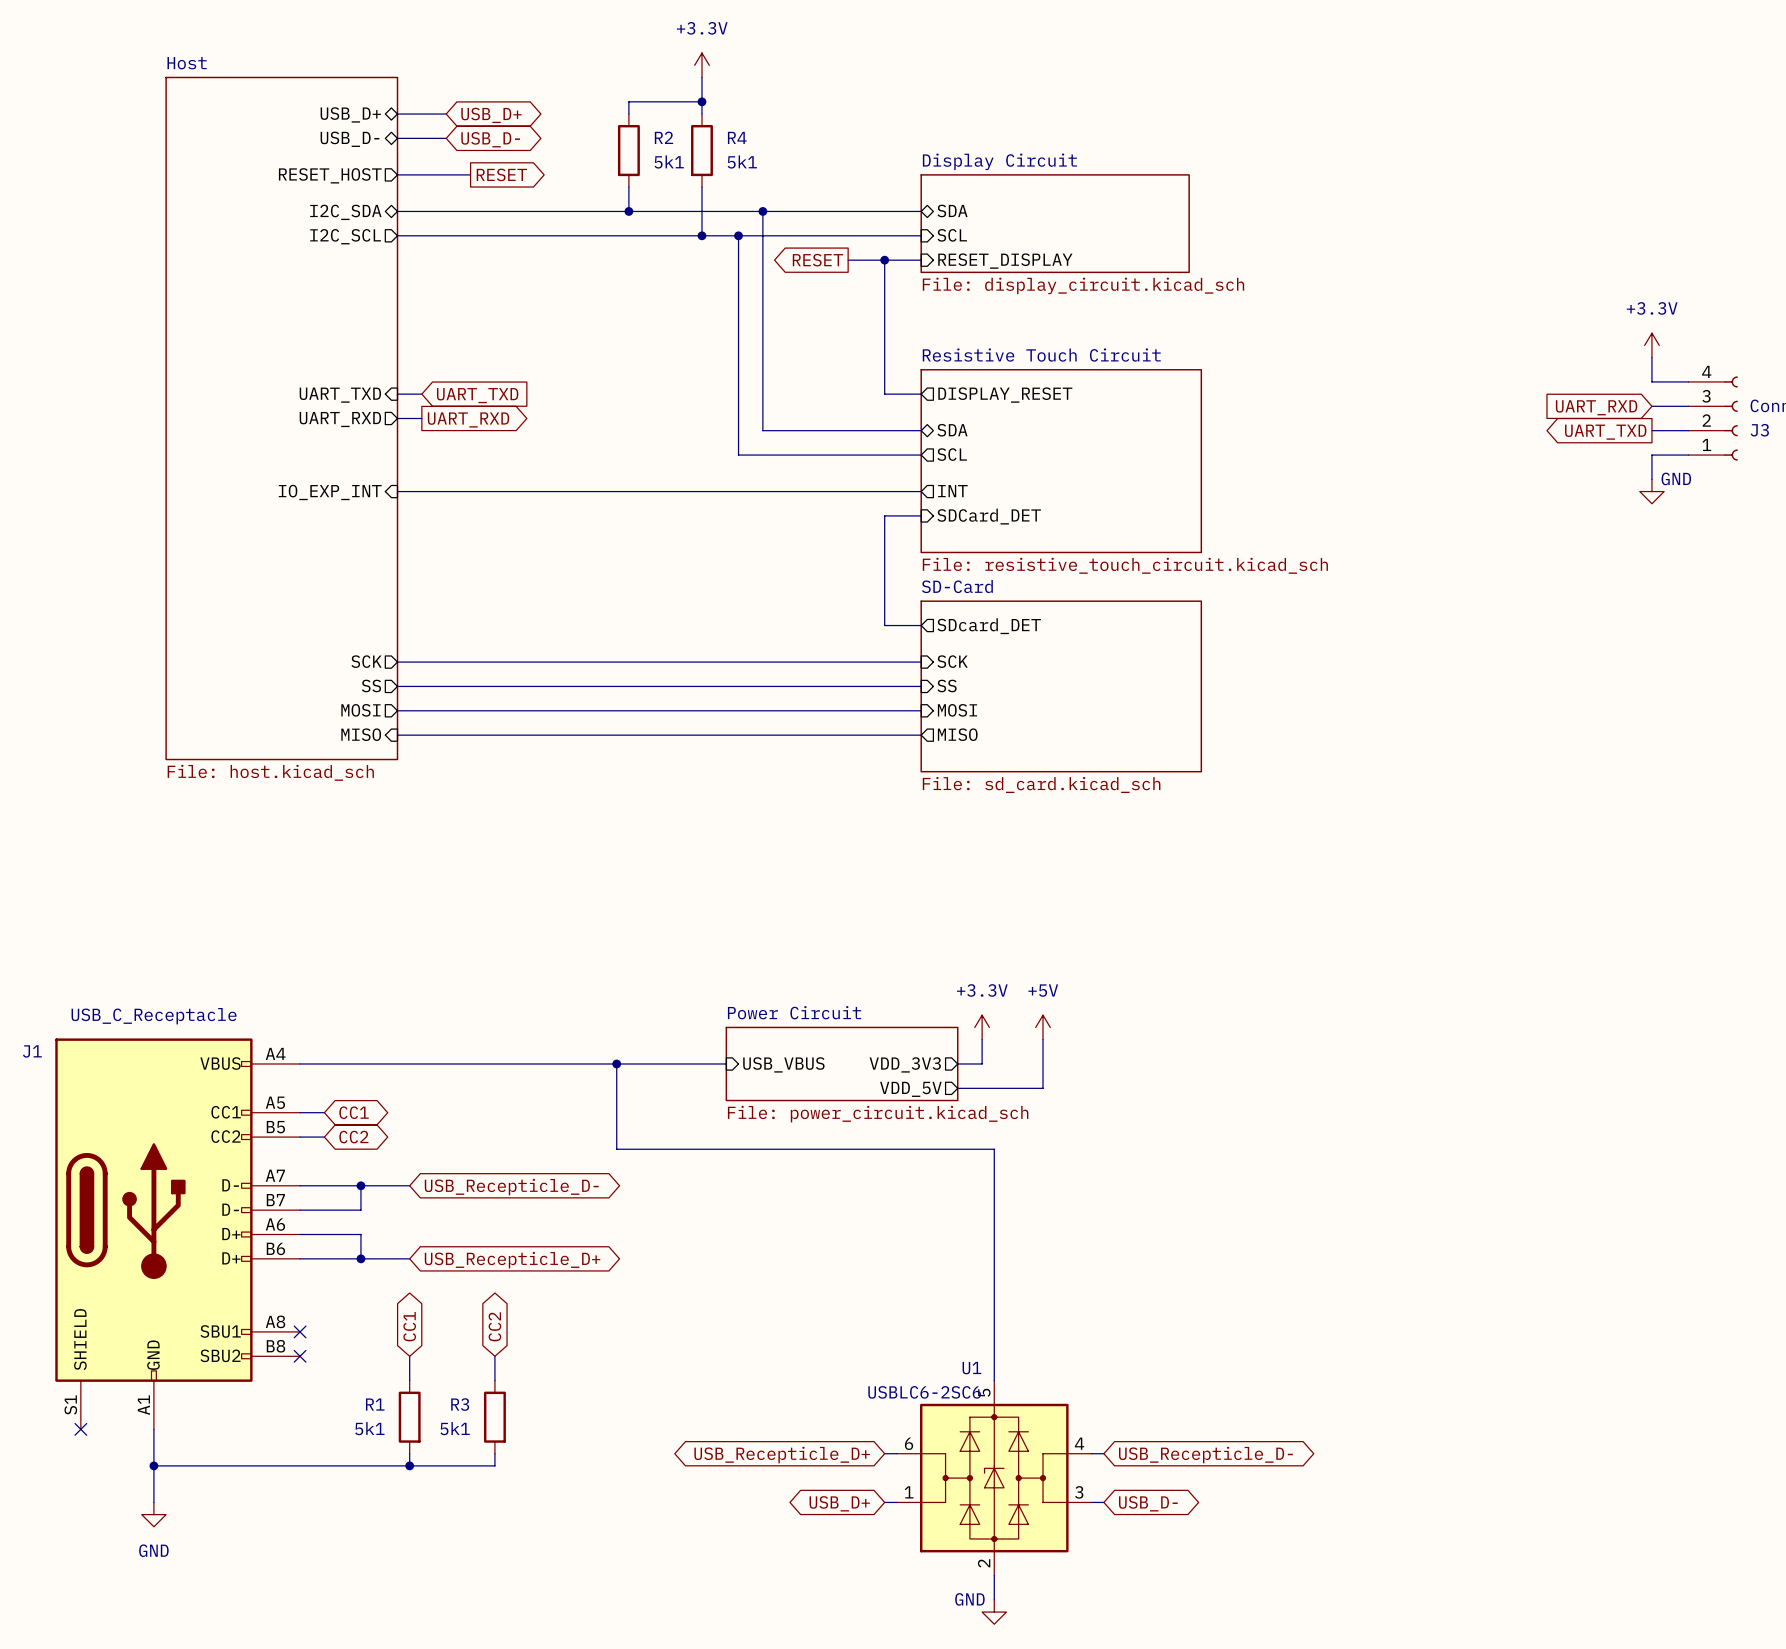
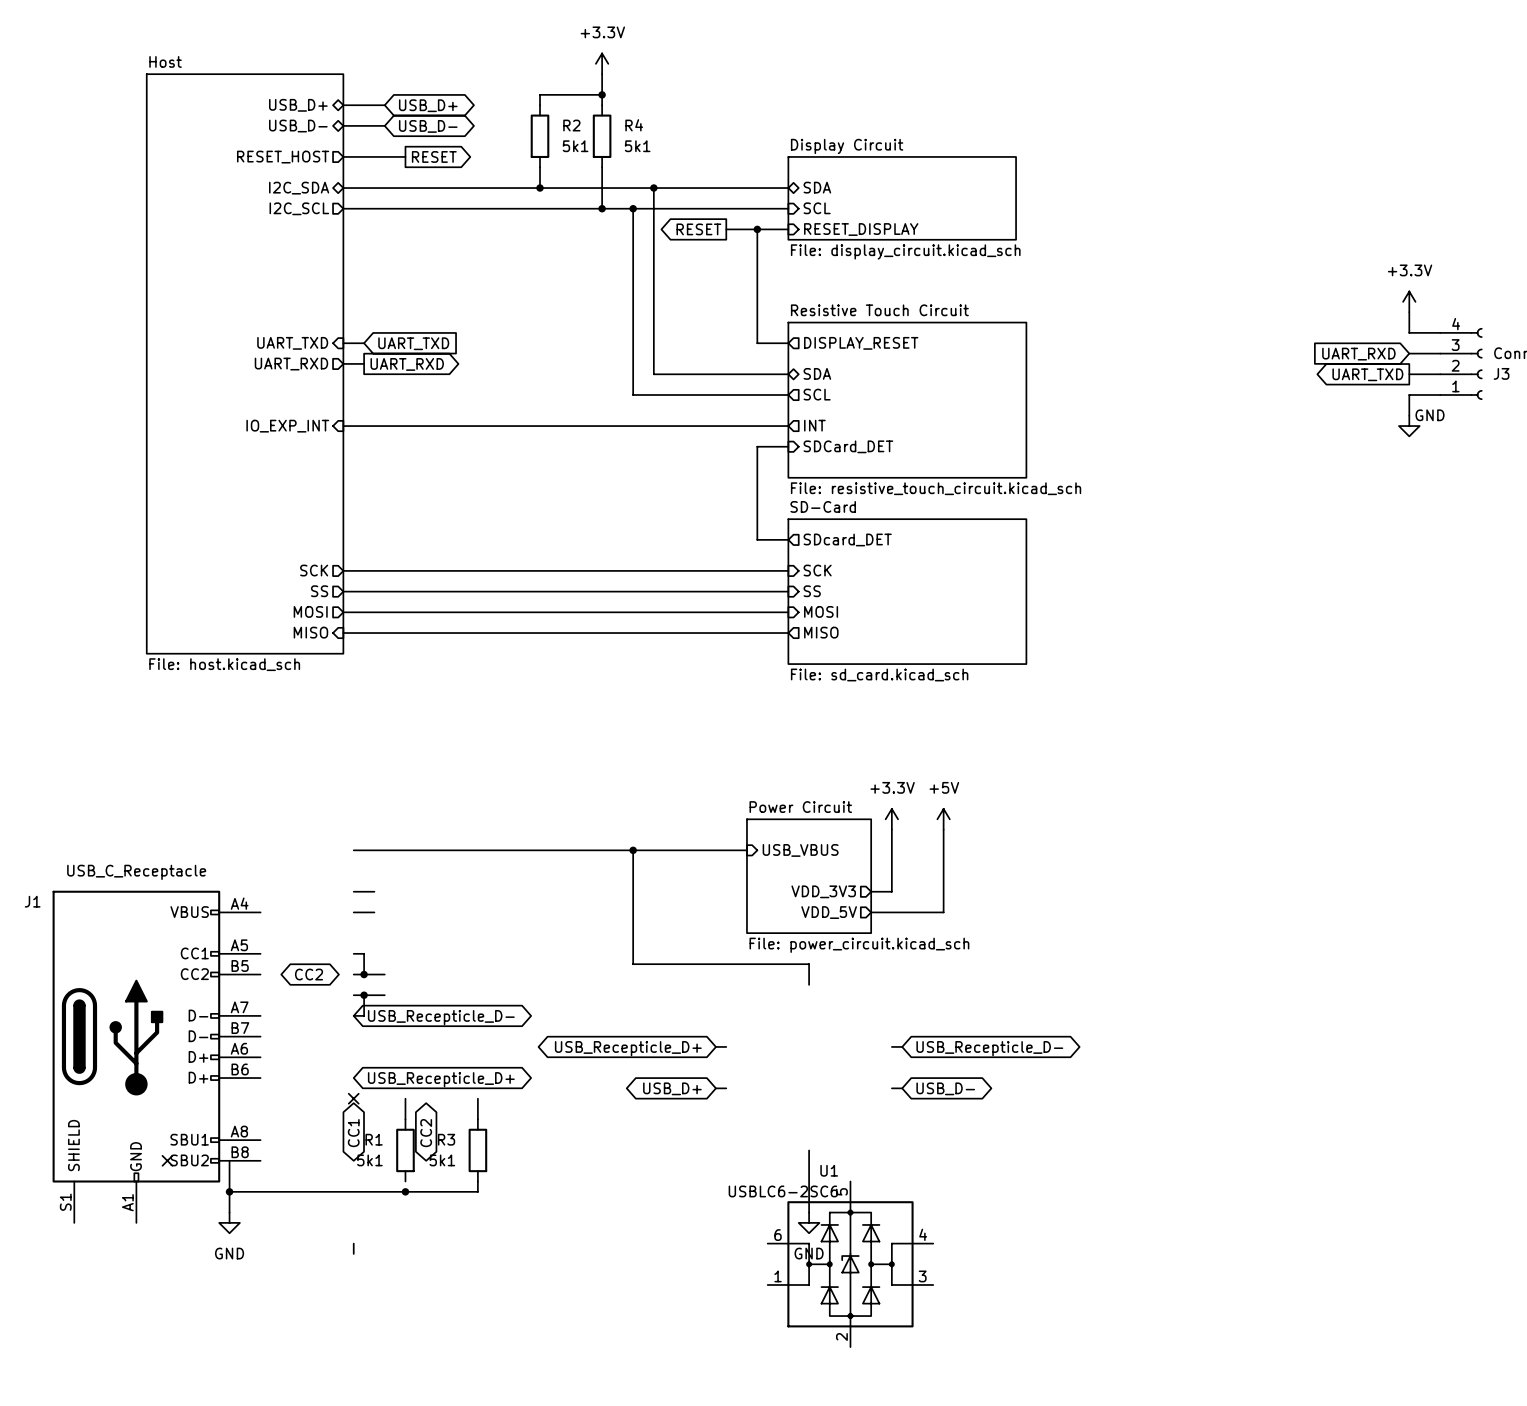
wire: none -> (891, 829) (891, 891) (871, 891)
wire: none -> (943, 829) (943, 912) (871, 912)
wire: none -> (353, 850) (746, 850)
wire: none -> (633, 850) (633, 964) (809, 964) (809, 984)
junction: none -> (633, 850)
sheet Power Circuit: none -> File: power_circuit.kicad_sch (809, 876)
power symbol position: +3.3V (982, 1027) -> +3.3V (891, 819)
power symbol position: +5V (1043, 1027) -> +5V (943, 819)
wire: (982, 1039) (982, 1063) (957, 1063) -> none
wire: (1043, 1039) (1043, 1088) (957, 1088) -> none
wire: (300, 1063) (409, 1063) -> none
wire: (434, 1063) (726, 1063) -> none
wire: (616, 1063) (616, 1149) (994, 1149) (994, 1380) -> none
junction: (616, 1063) -> none
sheet Power Circuit: File: power_circuit.kicad_sch (842, 1063) -> none
sheet pin position: USB_VBUS (783, 1064) -> USB_VBUS (800, 850)
sheet pin position: VDD_3V3 (905, 1064) -> VDD_3V3 (823, 891)
sheet pin position: VDD_5V (910, 1089) -> VDD_5V (829, 912)
wire: (300, 1112) (324, 1112) -> (353, 891) (374, 891)
global label: CC1 (354, 1112) -> none
wire: none -> (353, 953) (364, 953) (364, 974)
wire: (300, 1137) (324, 1137) -> none
wire: none -> (353, 974) (384, 974)
junction: none -> (364, 974)
wire: none -> (353, 995) (384, 995)
junction: none -> (364, 995)
wire: (300, 1185) (409, 1185) -> (364, 995) (364, 1015) (353, 1015)
wire: (360, 1185) (360, 1210) (300, 1210) -> none
junction: (360, 1185) -> none
wire: (300, 1234) (360, 1234) (360, 1258) -> none
wire: (300, 1258) (409, 1258) -> none
junction: (360, 1258) -> none
no-connect mark: none -> (353, 1098)
no-connect mark: (300, 1331) -> none
wire: none -> (809, 1150) (809, 1212)
no-connect mark: none -> (167, 1160)
wire: none -> (229, 1160) (229, 1212)
no-connect mark: (300, 1356) -> none
wire: (409, 1356) (409, 1380) -> (405, 1098) (405, 1119)
wire: (494, 1356) (494, 1380) -> (477, 1098) (477, 1119)
wire: none -> (477, 1181) (477, 1191) (229, 1191)
junction: none -> (229, 1191)
junction: none -> (405, 1191)
R1 position: (409, 1417) -> (405, 1150)
R3 position: (494, 1417) -> (477, 1150)
no-connect mark: (80, 1429) -> none
wire: (153, 1429) (153, 1502) -> none
wire: (494, 1453) (494, 1465) (153, 1465) -> none
wire: (884, 1453) (896, 1453) -> (715, 1046) (726, 1046)
wire: (1091, 1453) (1103, 1453) -> (891, 1046) (902, 1046)
global label position: USB_Recepticle_D+ (782, 1455) -> USB_Recepticle_D+ (628, 1048)
global label position: USB_Recepticle_D- (1205, 1455) -> USB_Recepticle_D- (989, 1048)
junction: (153, 1465) -> none
junction: (409, 1465) -> none
wire: (884, 1502) (896, 1502) -> (715, 1088) (726, 1088)
wire: (1091, 1502) (1103, 1502) -> (891, 1088) (902, 1088)
global label position: USB_D+ (839, 1503) -> USB_D+ (672, 1088)
global label position: USB_D- (1148, 1503) -> USB_D- (945, 1088)
power symbol position: GND (153, 1514) -> GND (229, 1222)
wire: (994, 1575) (994, 1599) -> none
power symbol text position: GND (969, 1599) -> GND (809, 1253)
power symbol position: GND (994, 1612) -> GND (809, 1222)

